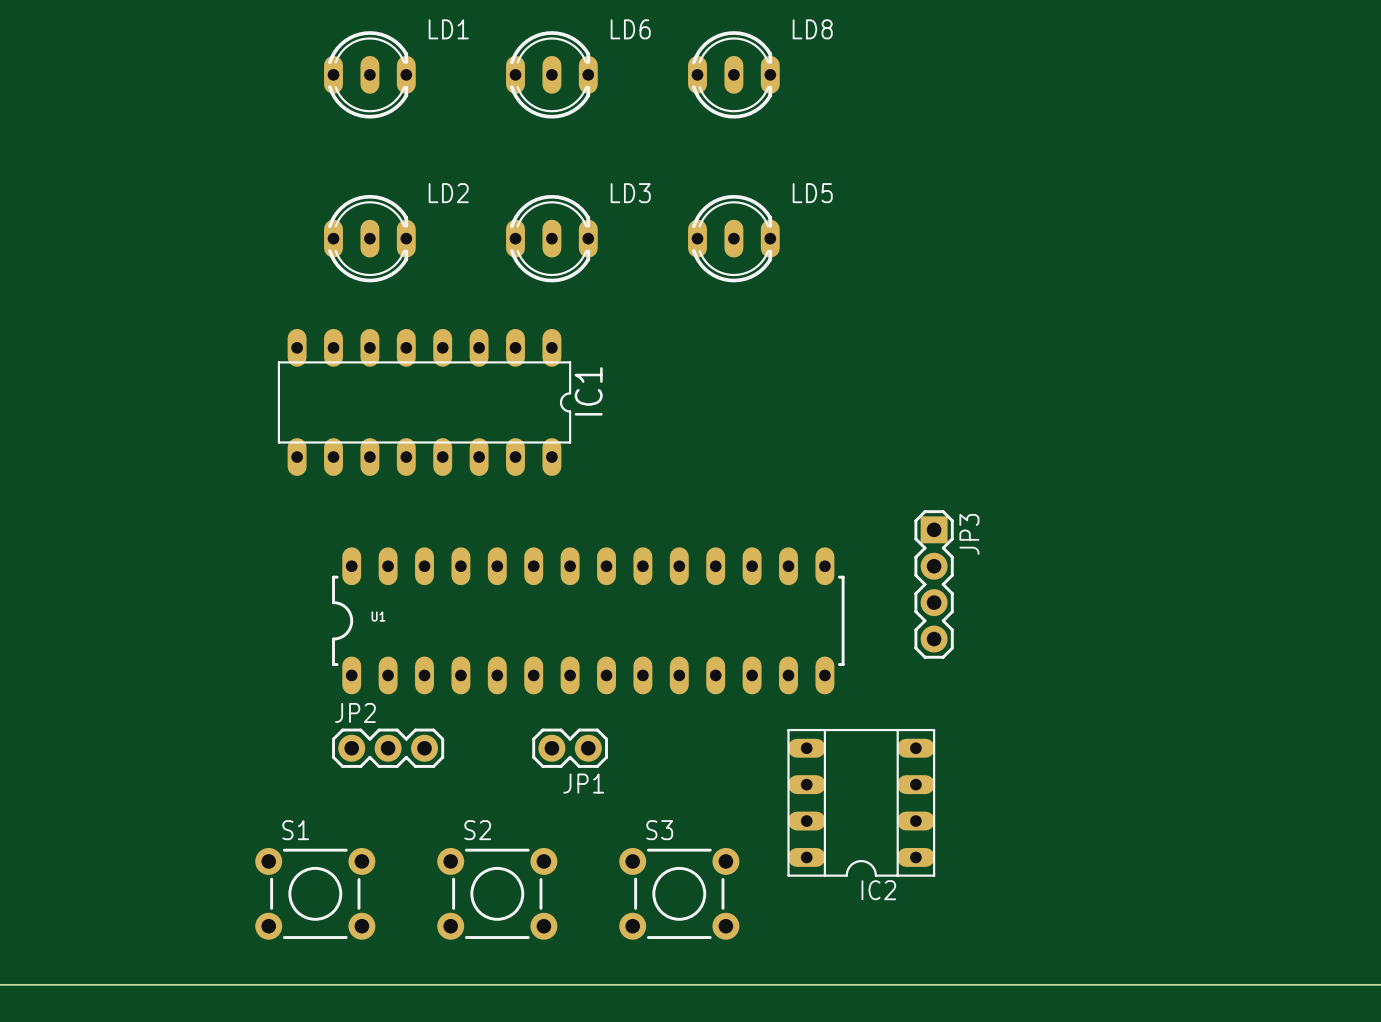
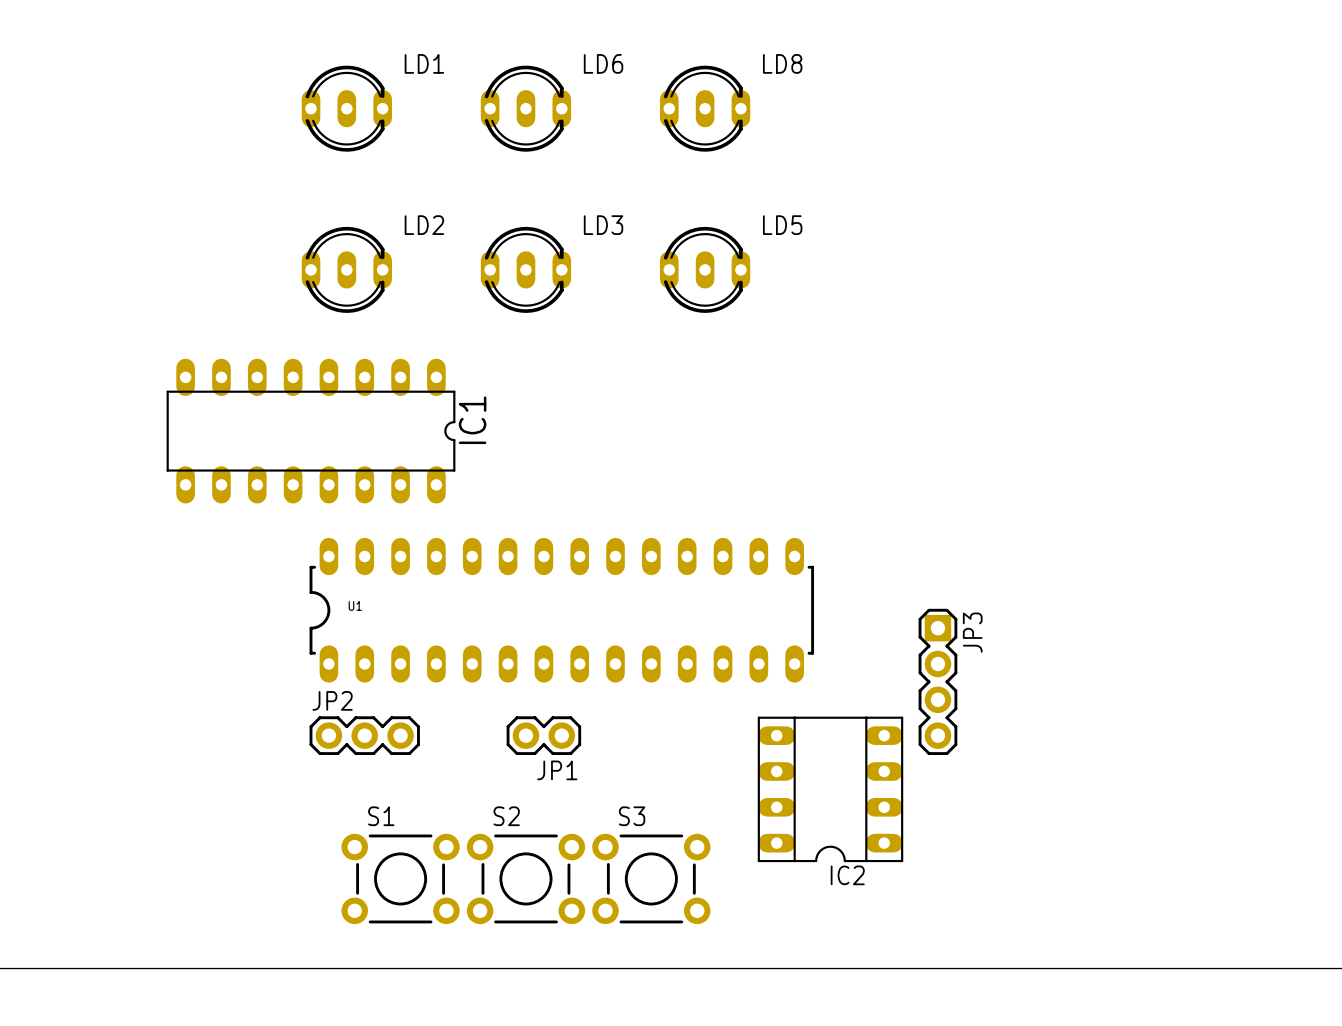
LD1 position: (369, 74) -> (346, 108)
LD6 position: (551, 74) -> (525, 108)
LD8 position: (733, 74) -> (705, 108)
LD2 position: (369, 238) -> (346, 269)
LD3 position: (551, 238) -> (525, 269)
LD5 position: (733, 238) -> (705, 269)
IC1 position: (424, 402) -> (311, 431)
JP3 position: (934, 584) -> (937, 681)
S1 position: (315, 893) -> (400, 878)
S2 position: (497, 893) -> (525, 878)

